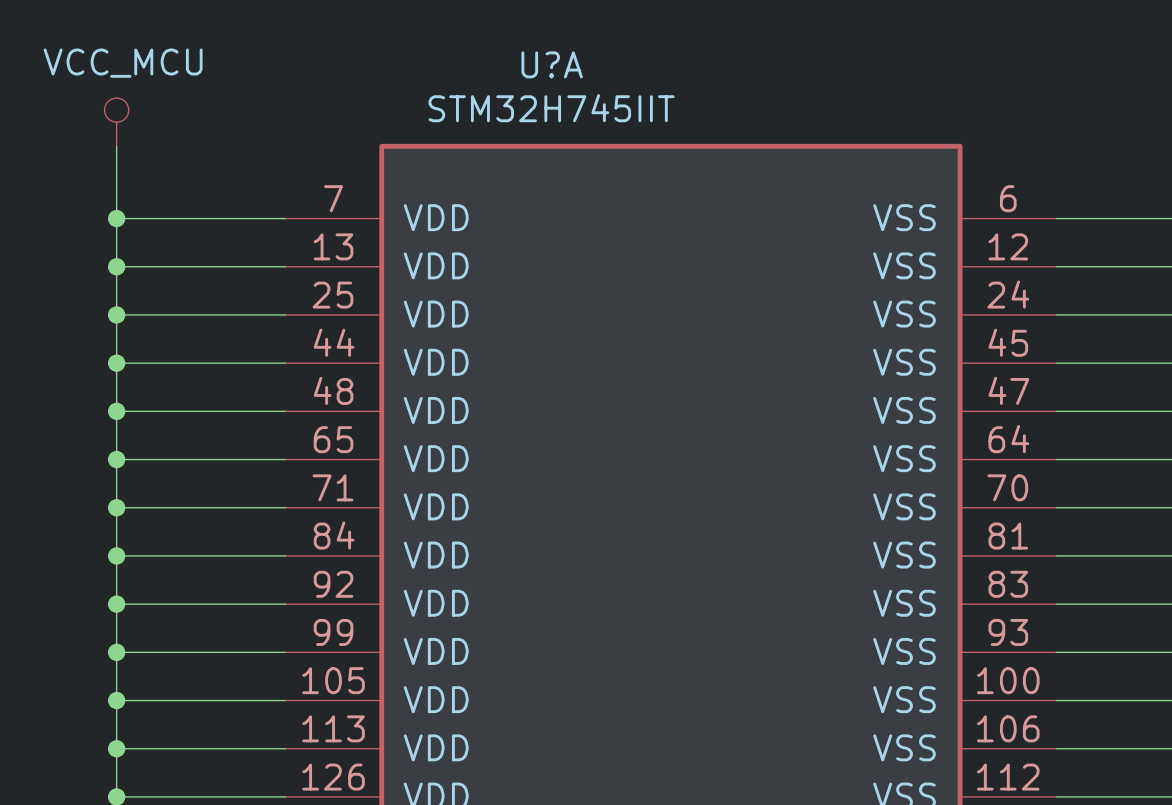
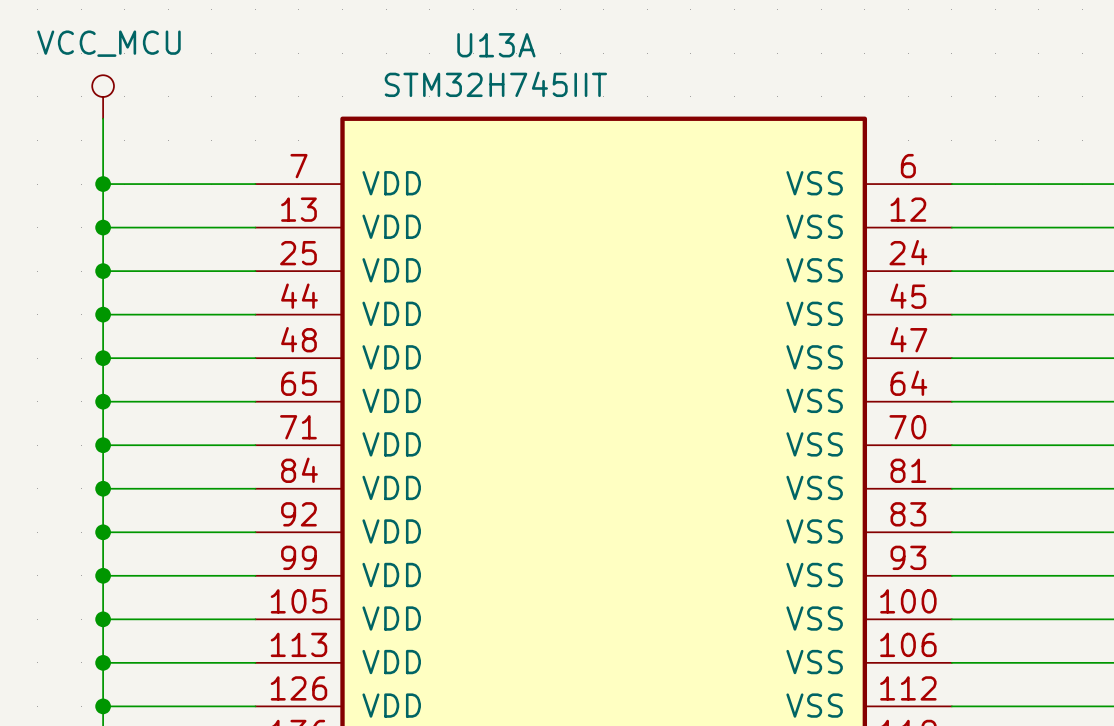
U?A name: U?A (552, 64) -> U13A (496, 45)

